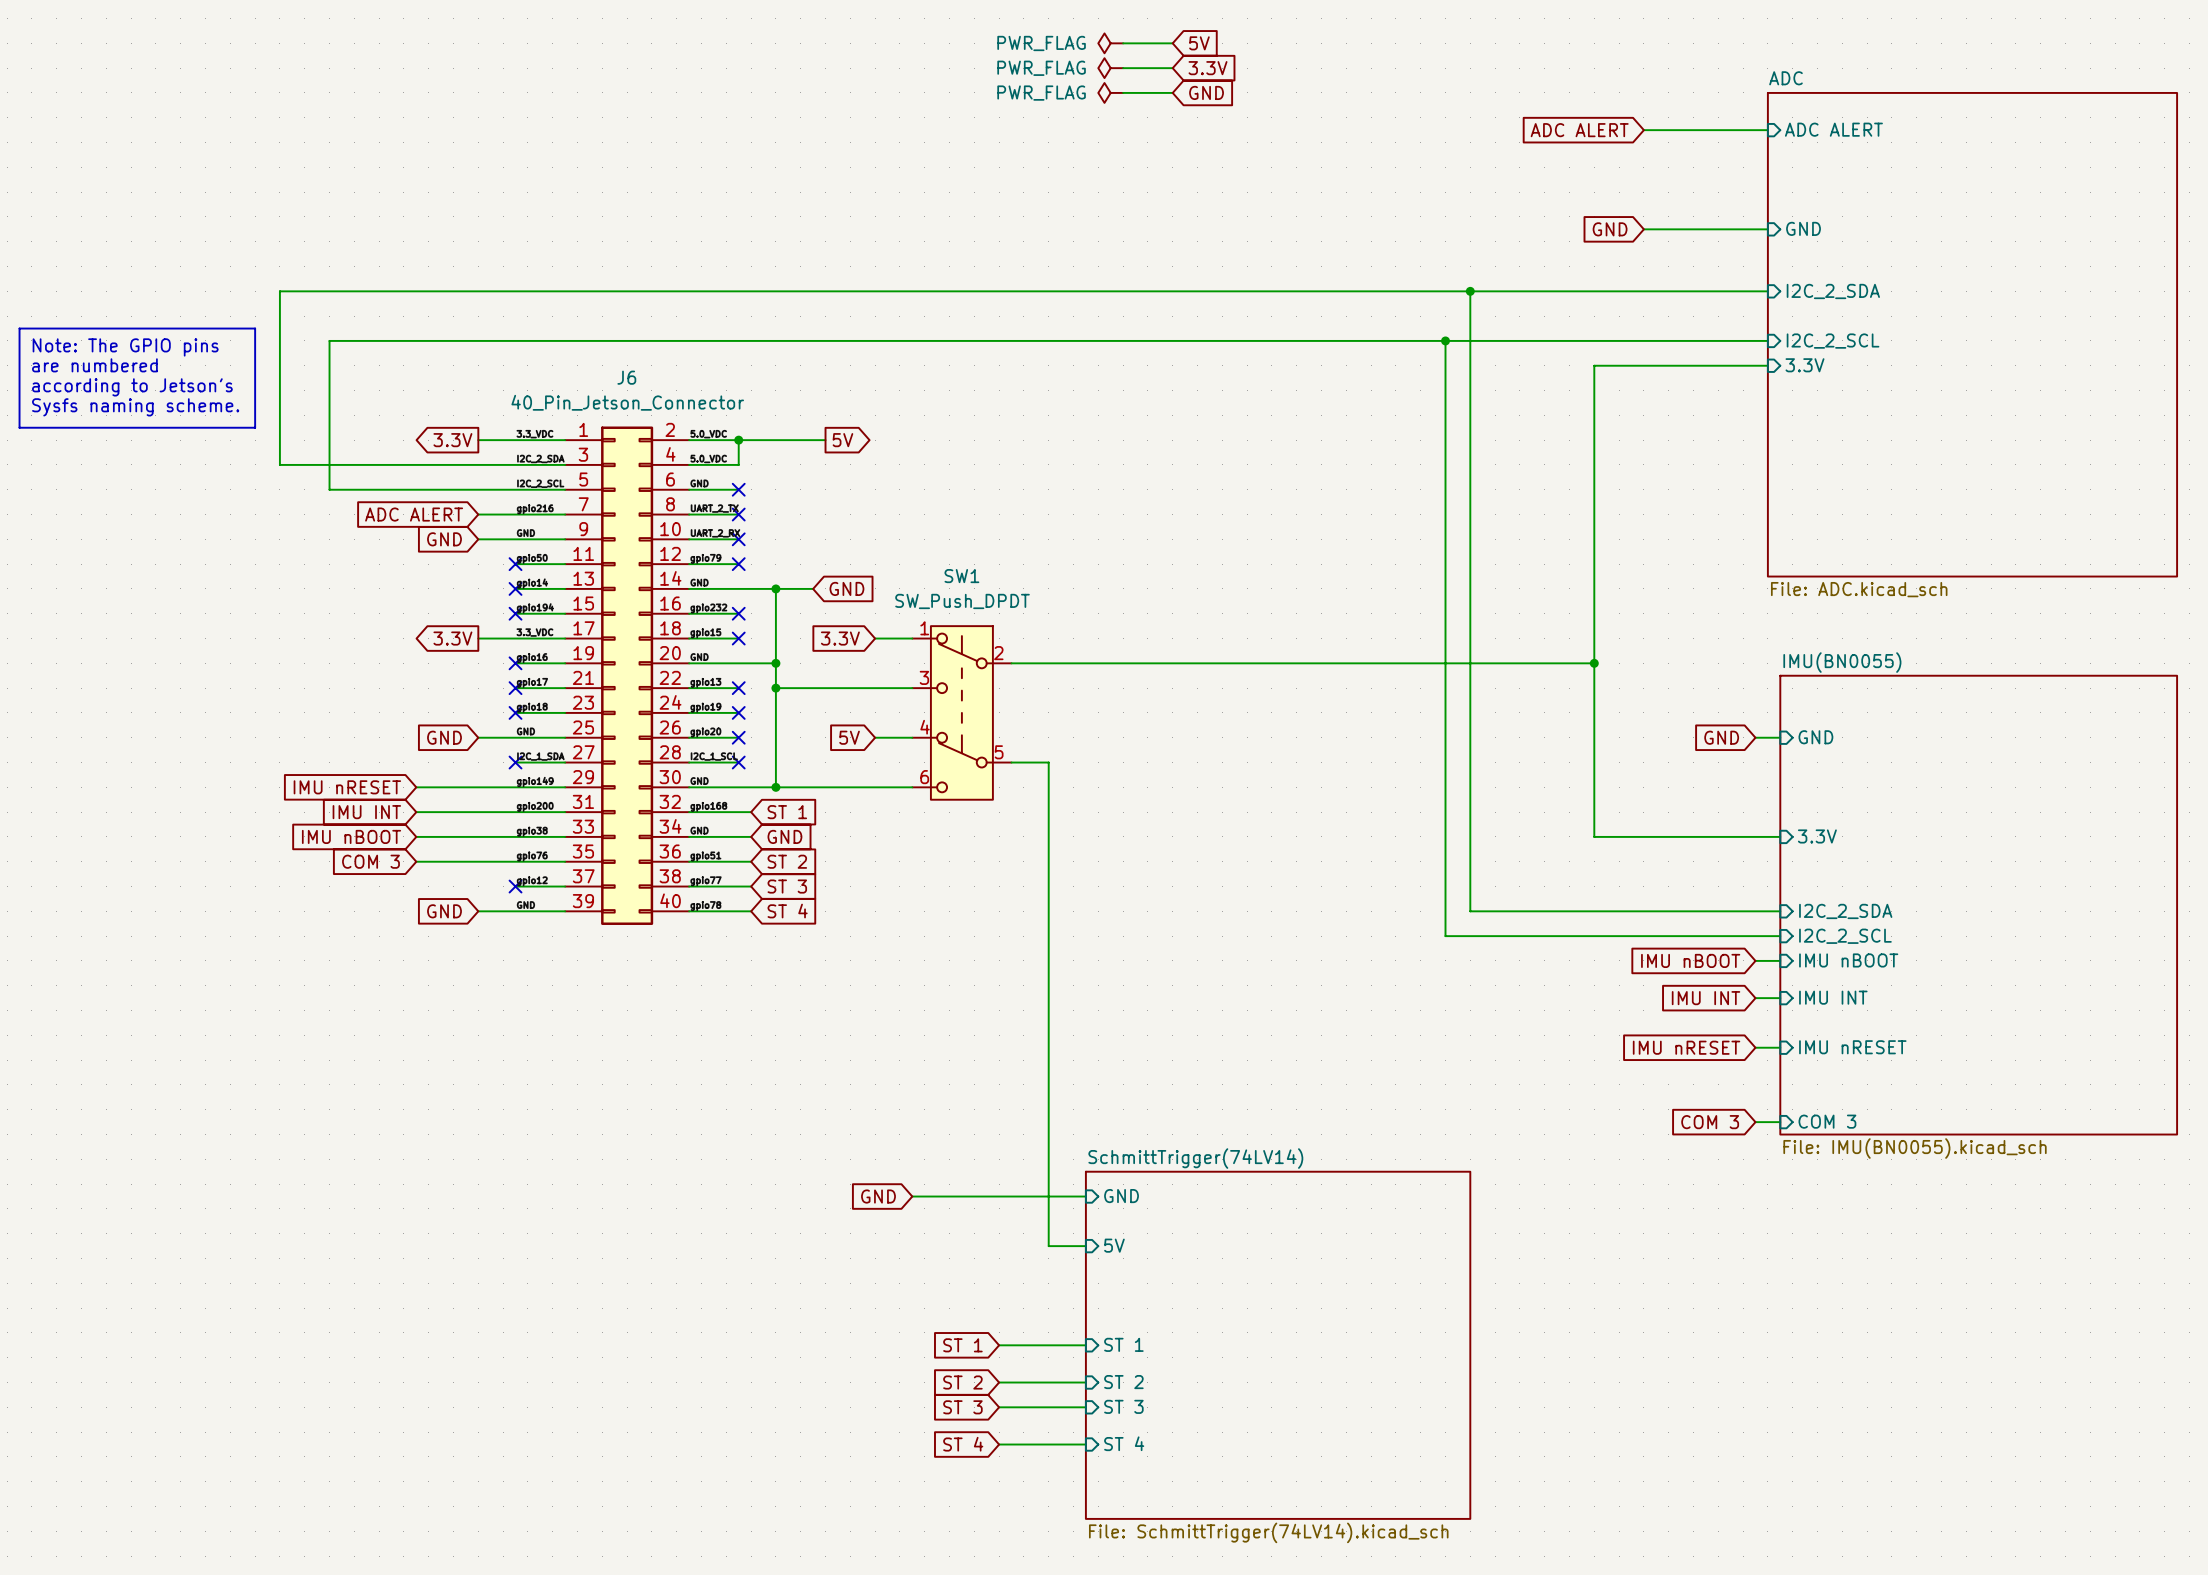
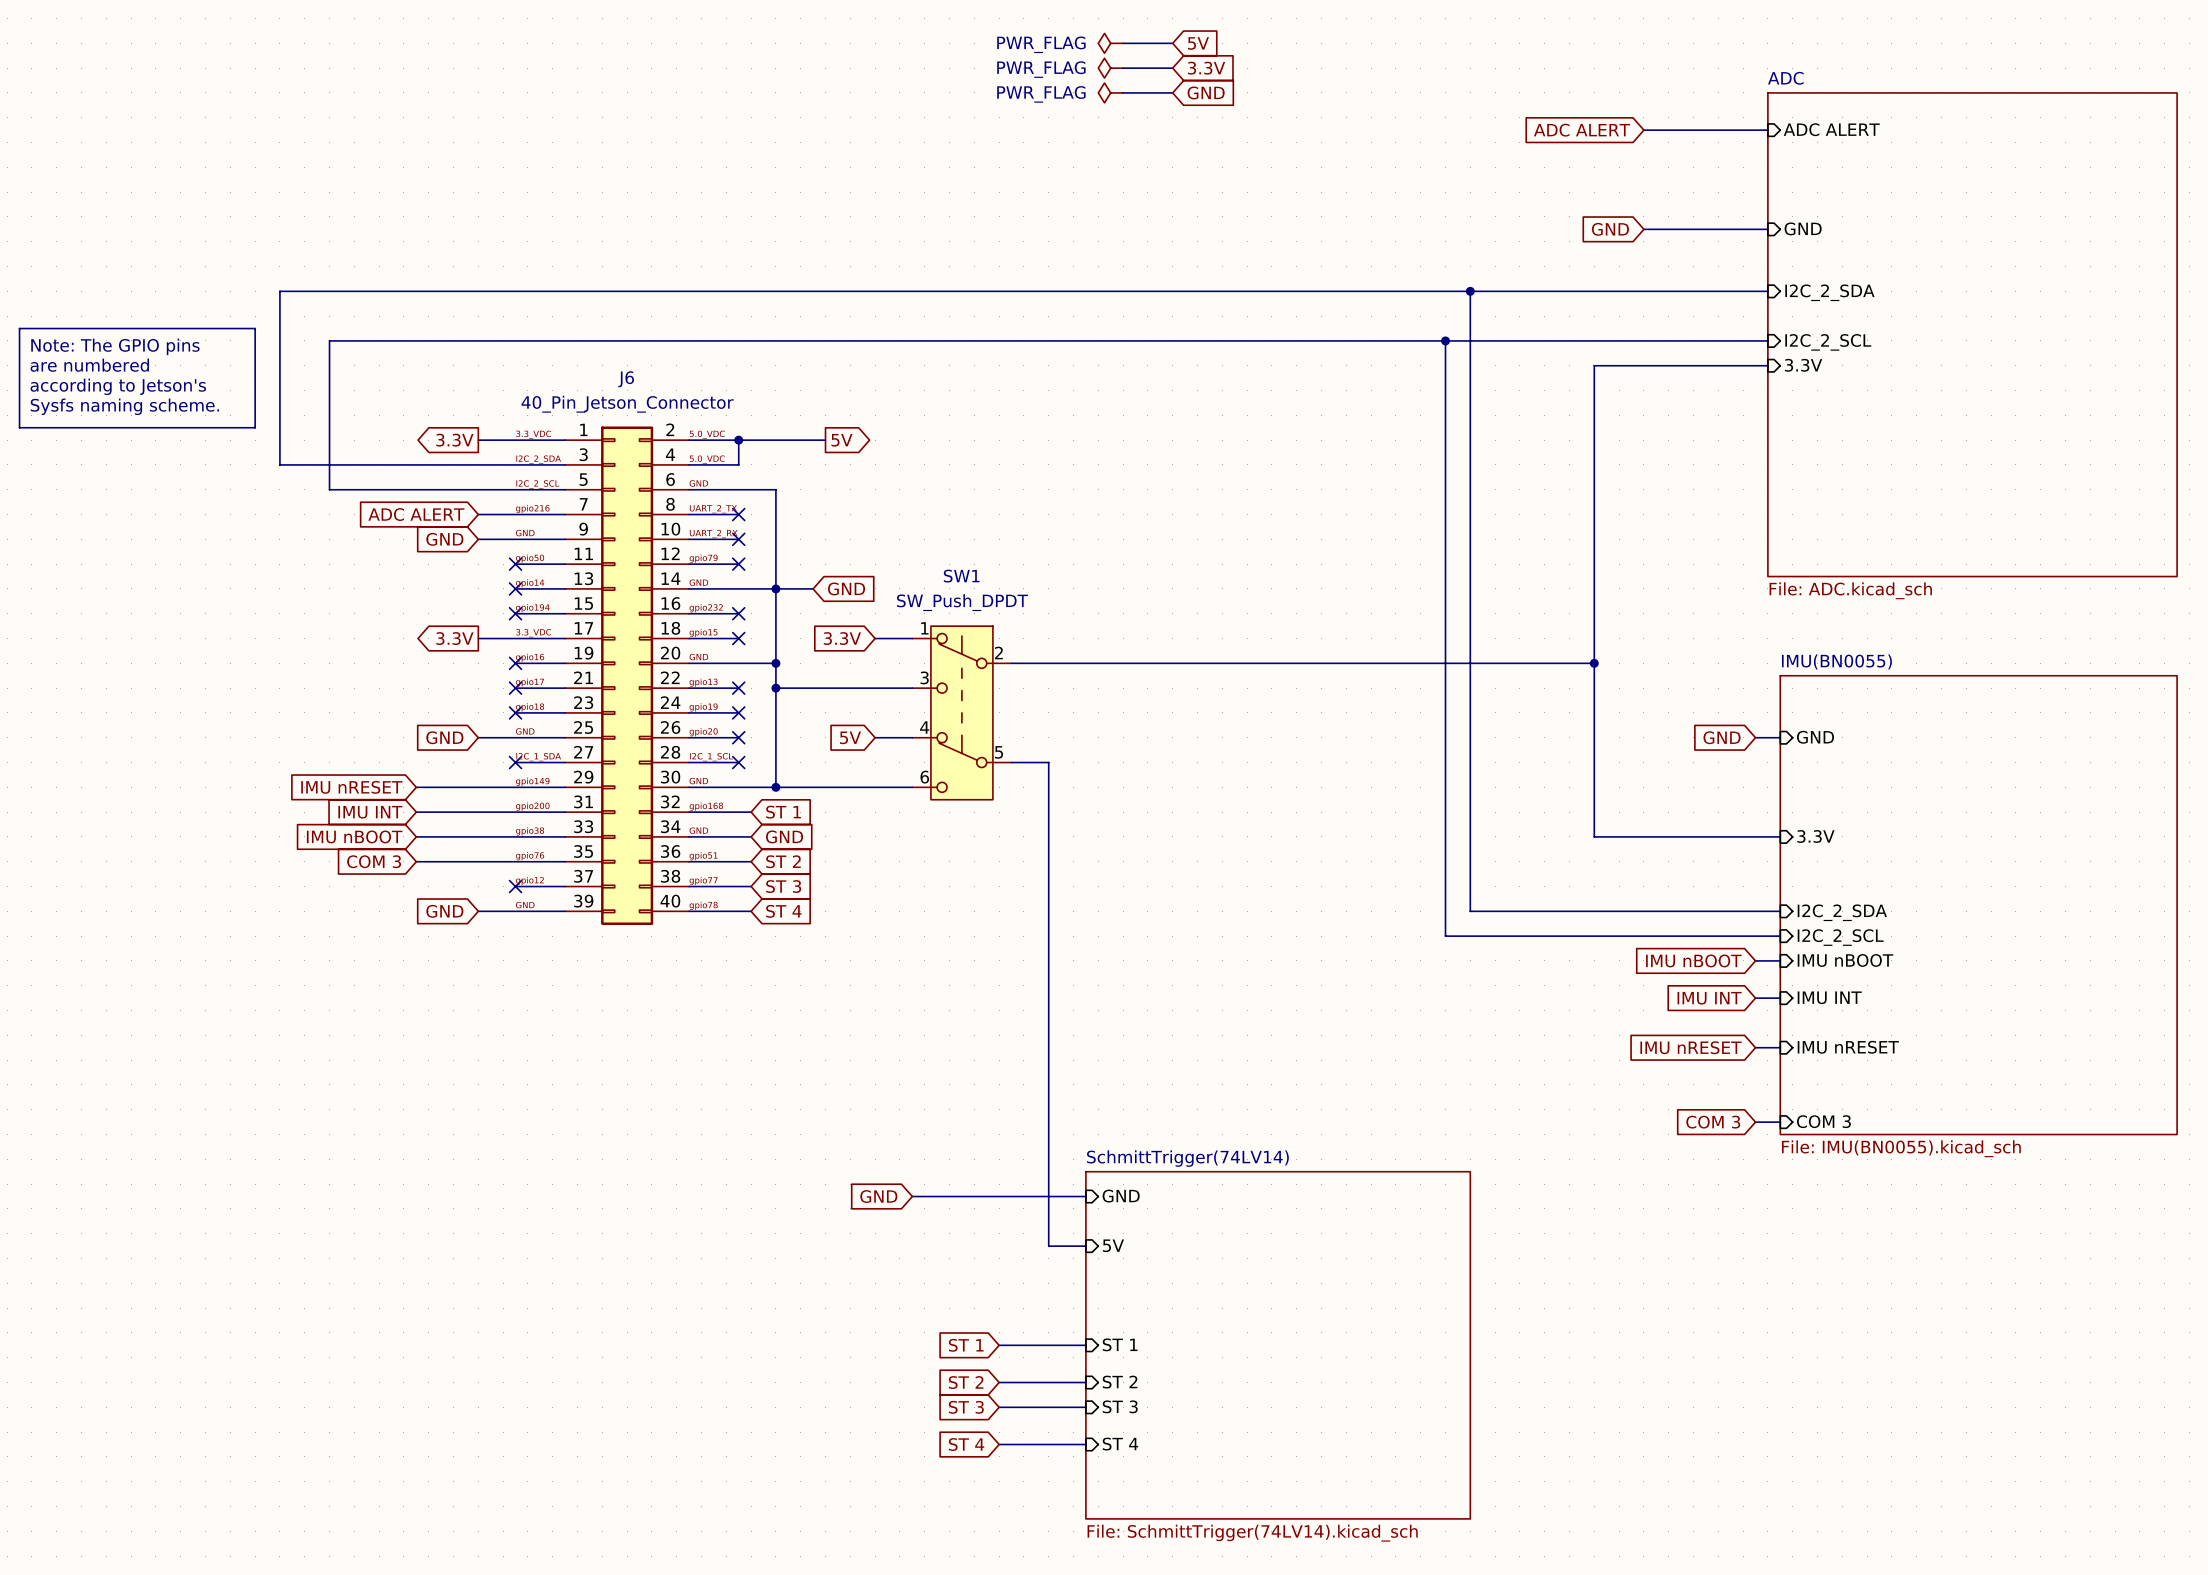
wire: none -> (738, 489) (775, 489) (775, 588)
no-connect mark: (738, 489) -> none

